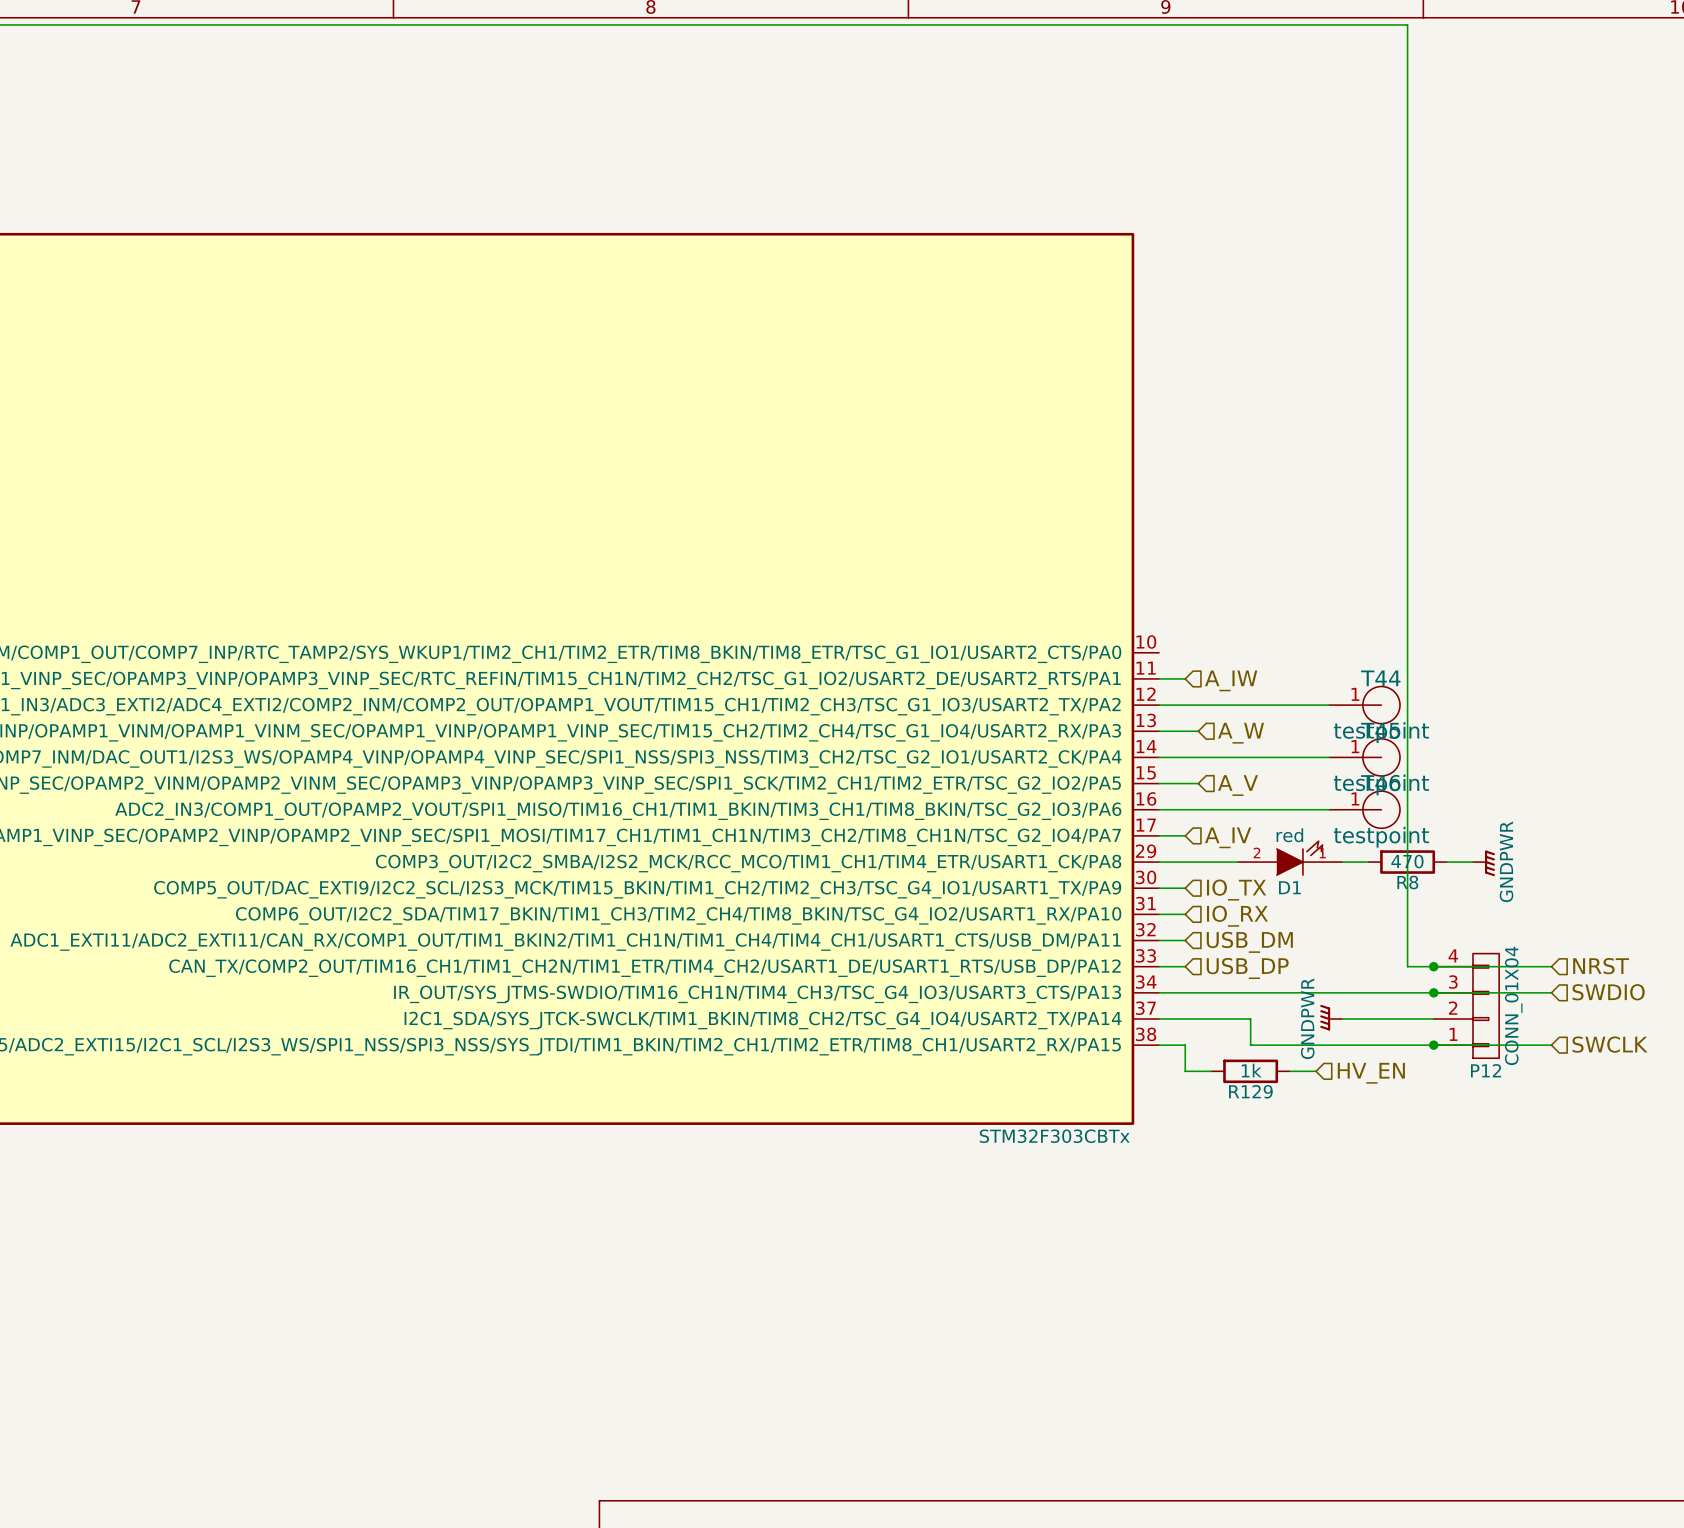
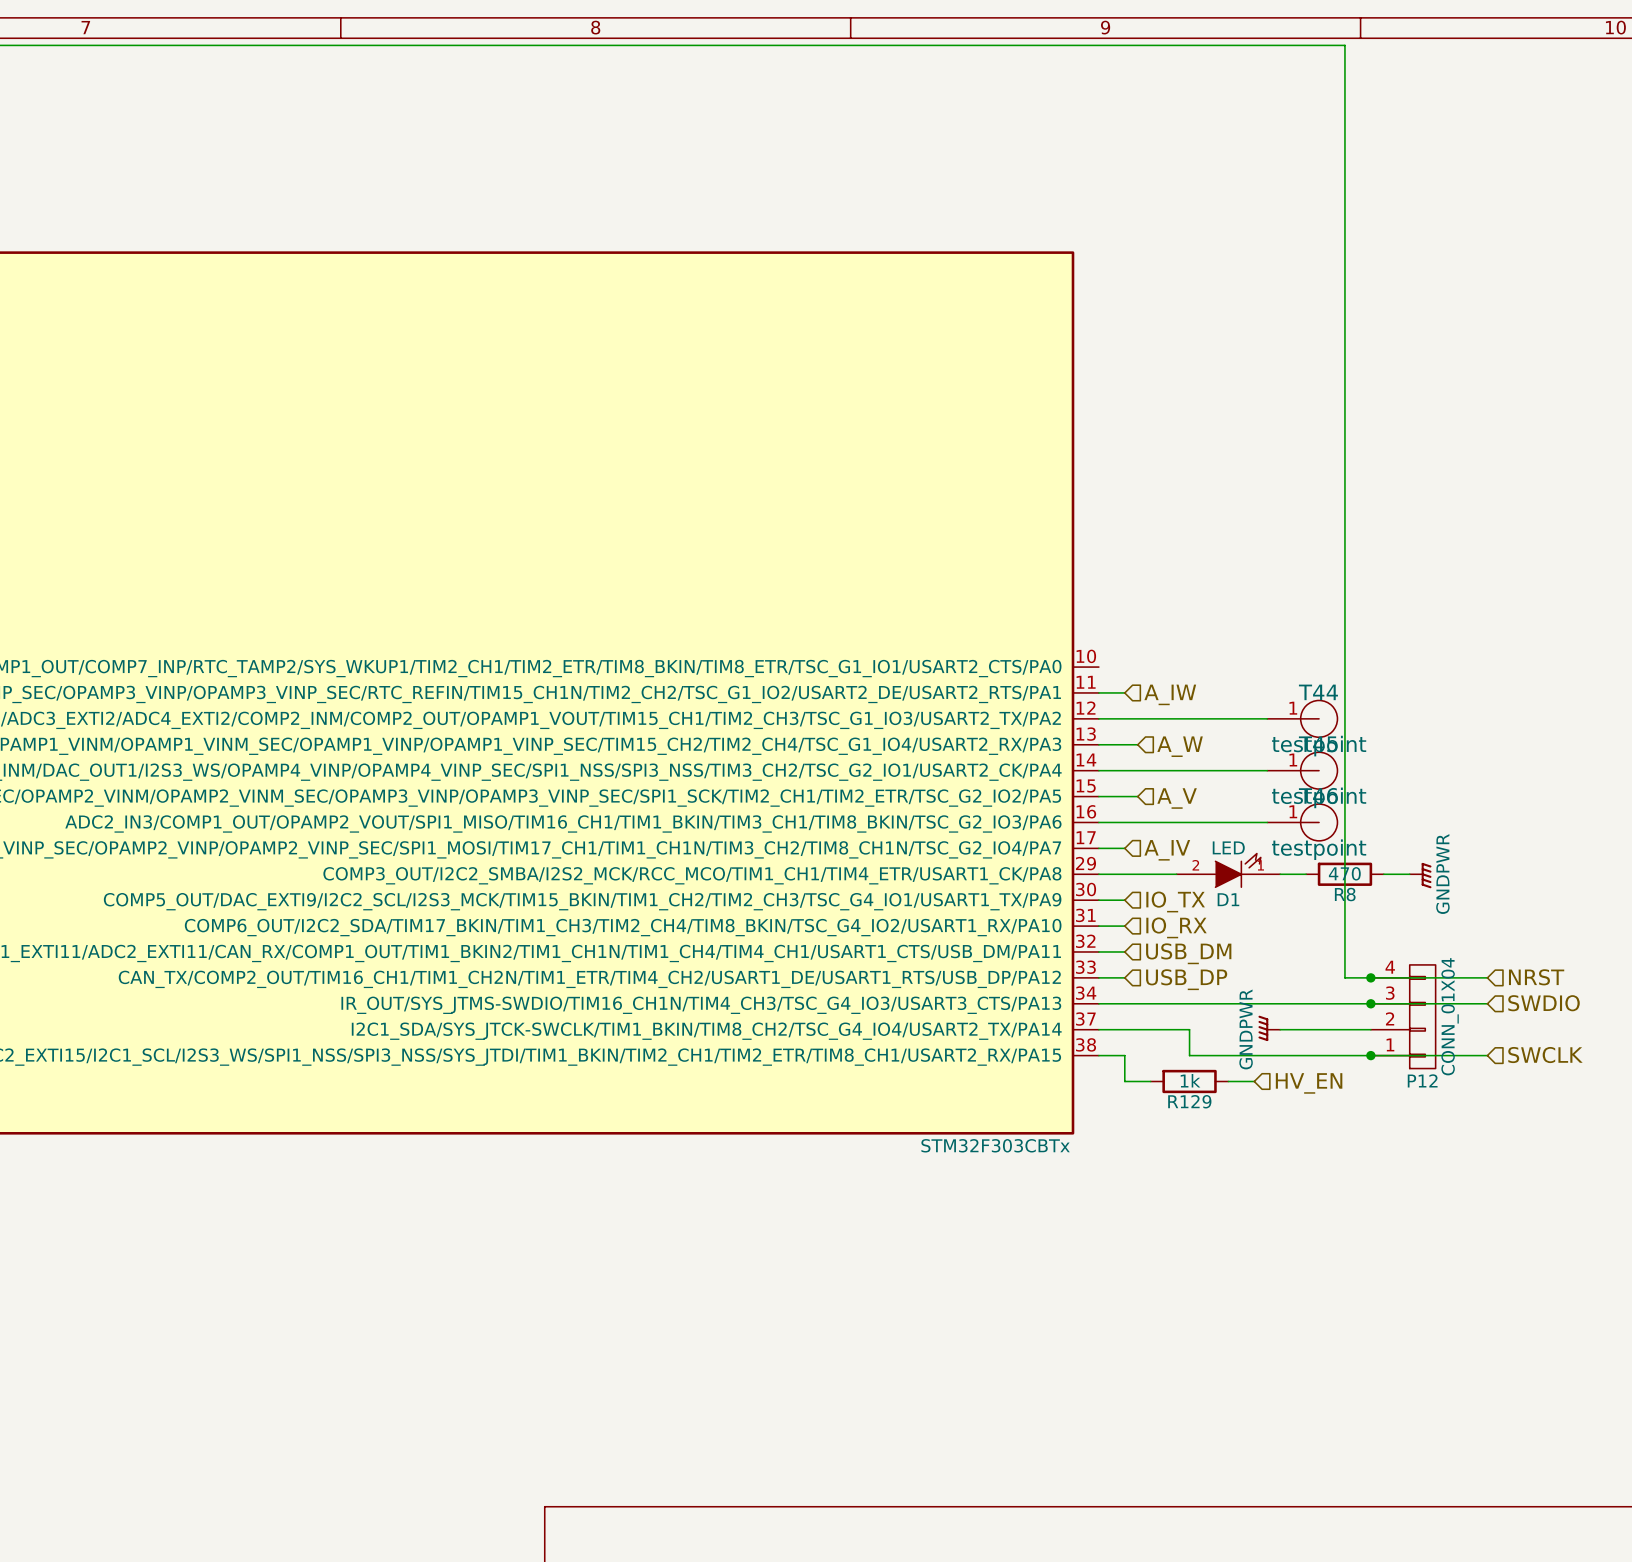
D1 value: red (1289, 835) -> LED (1228, 847)

